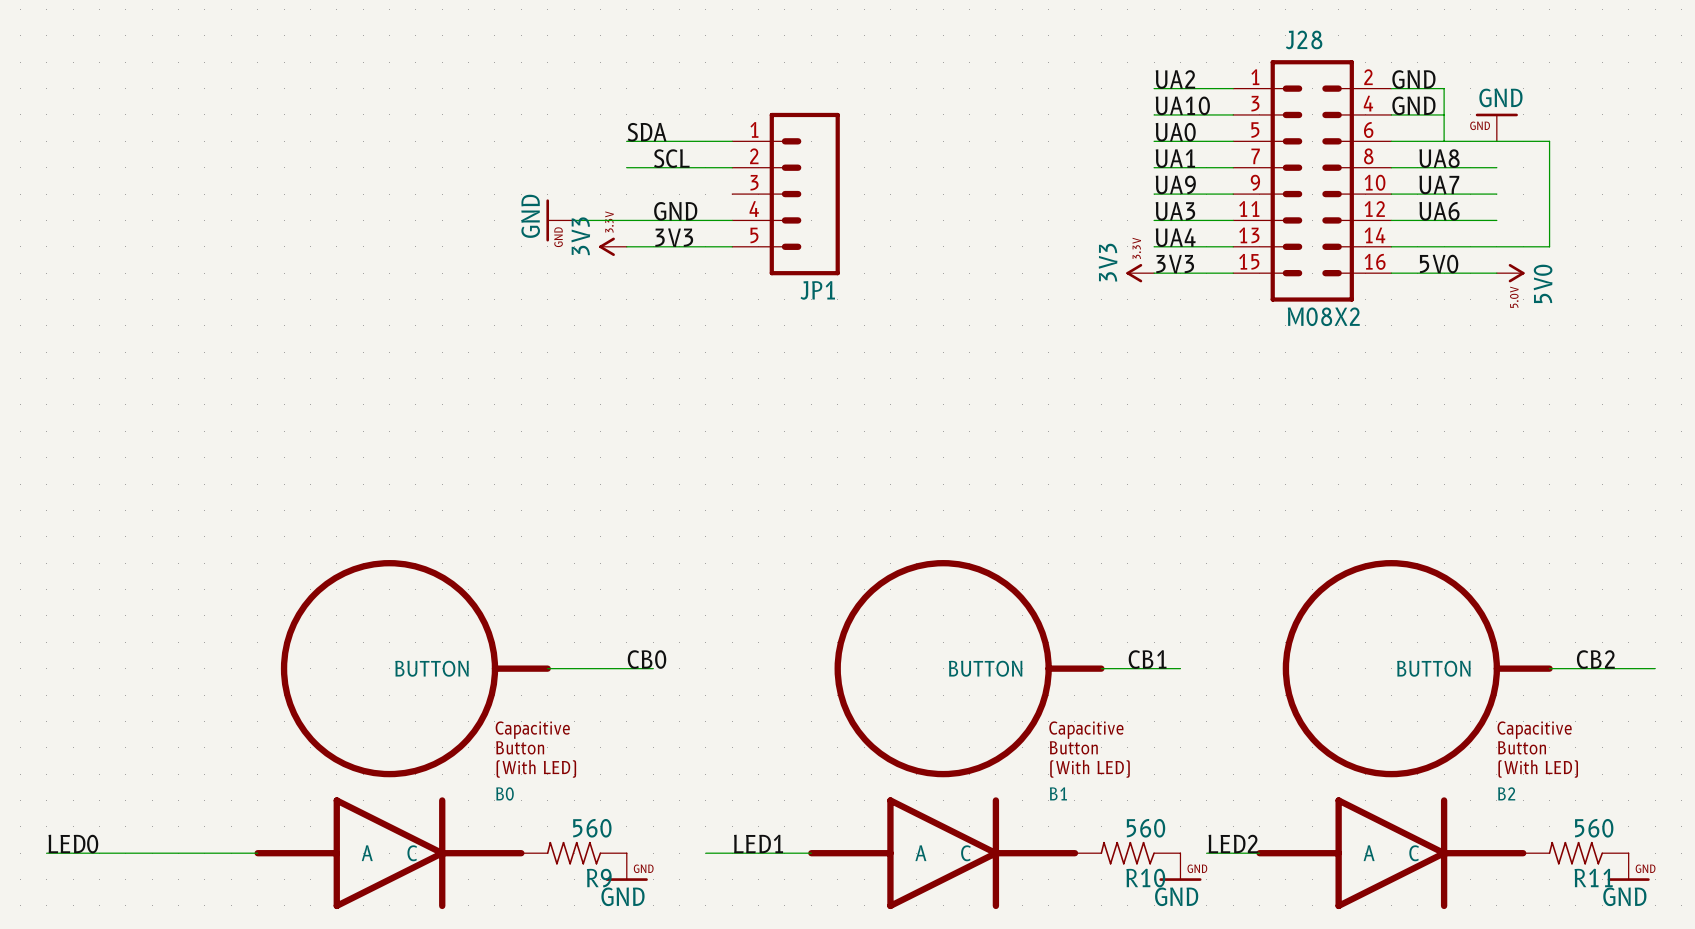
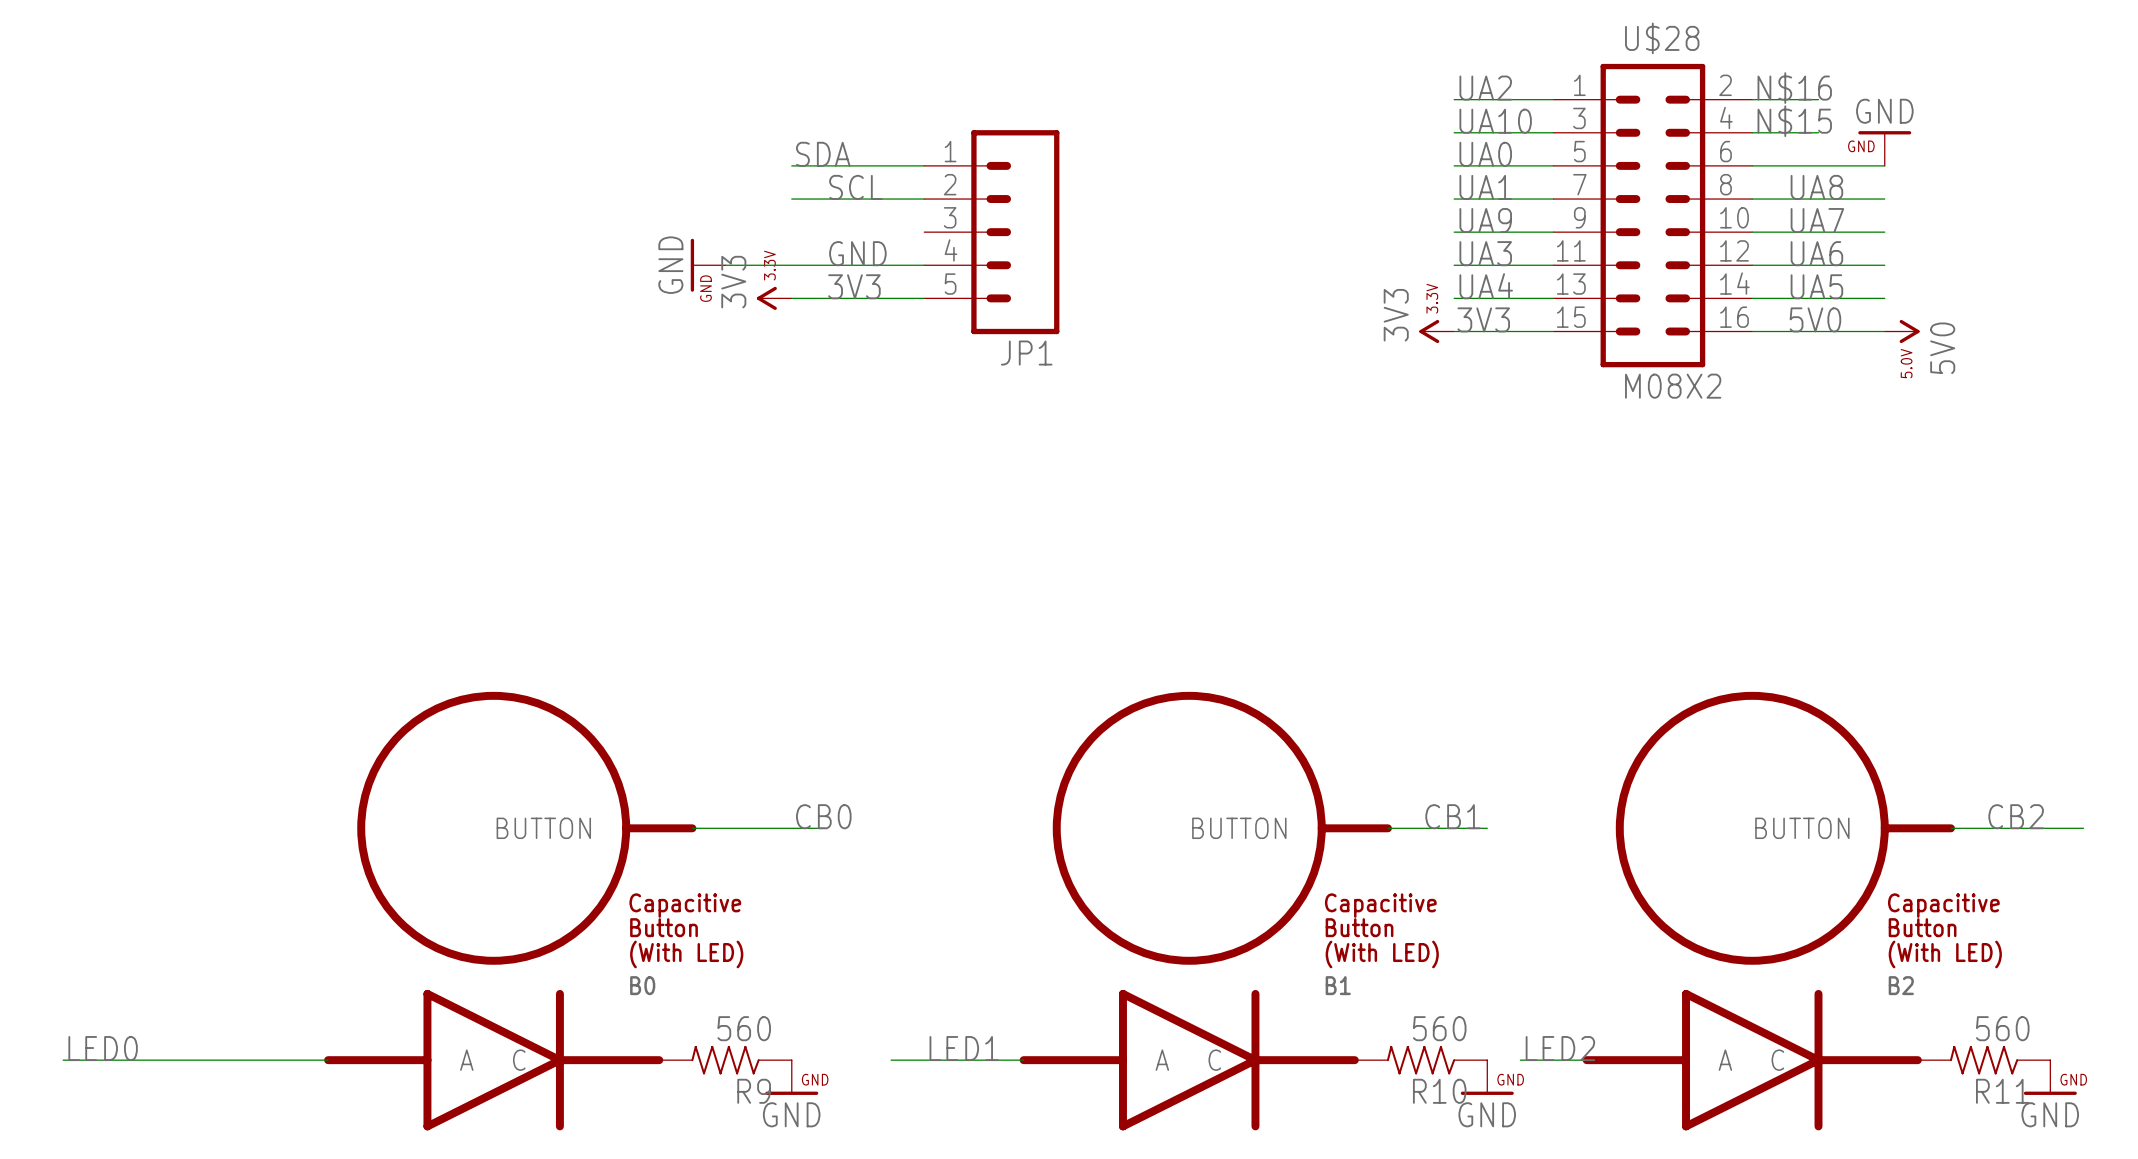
J28 name: J28 (1304, 39) -> U$28 (1662, 38)
label: GND (1413, 79) -> N$16 (1794, 88)
wire: (1444, 88) (1444, 141) -> none
label: GND (1413, 105) -> N$15 (1794, 121)
wire: (1496, 141) (1549, 141) (1549, 246) (1496, 246) -> none
label: none -> UA5 (1816, 286)

